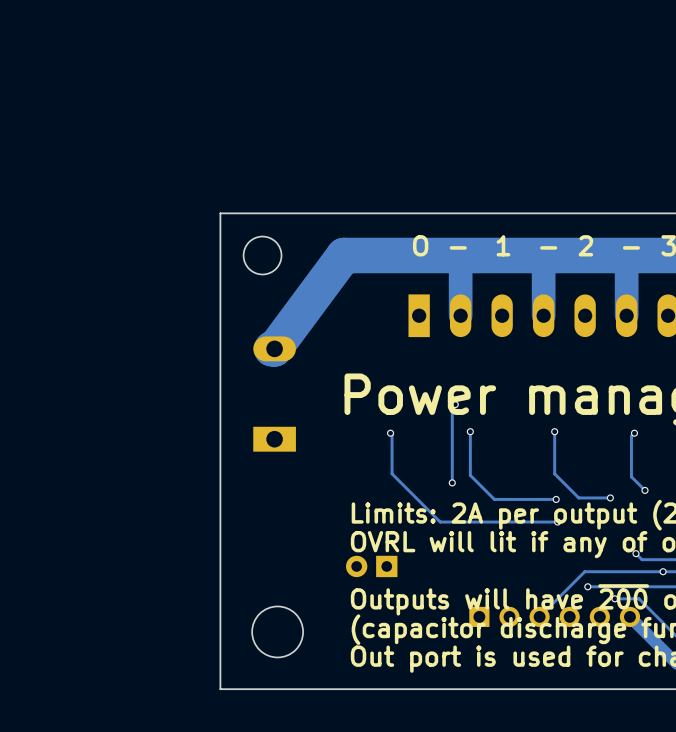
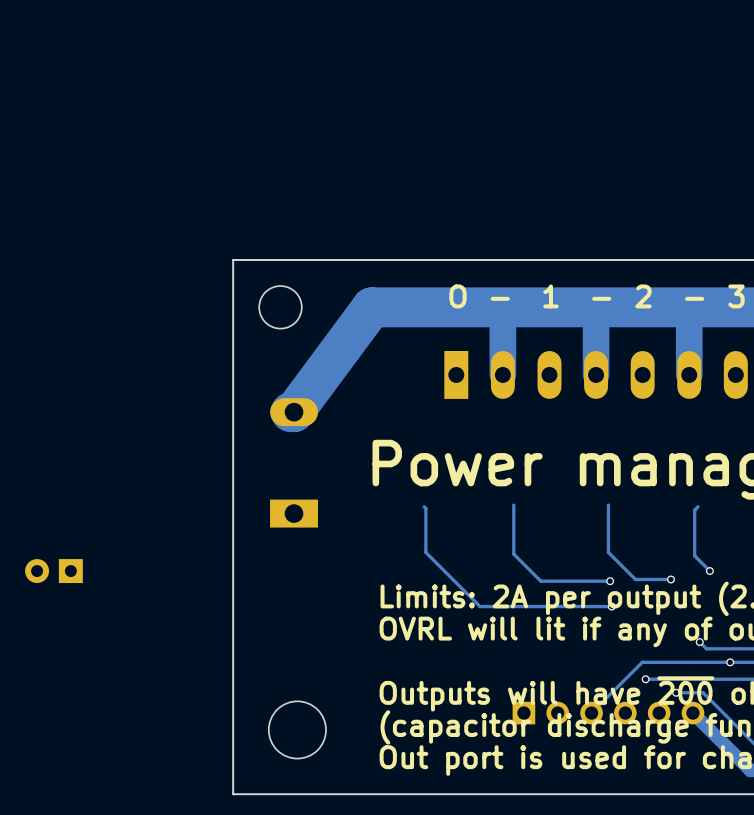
track: (455, 404) (452, 407) (452, 482) -> none
via: (455, 404) -> none
via: (470, 431) -> none
via: (554, 431) -> none
via: (390, 433) -> none
via: (634, 433) -> none
via: (452, 482) -> none
part: none -> (53, 571)
part: (371, 566) -> none

